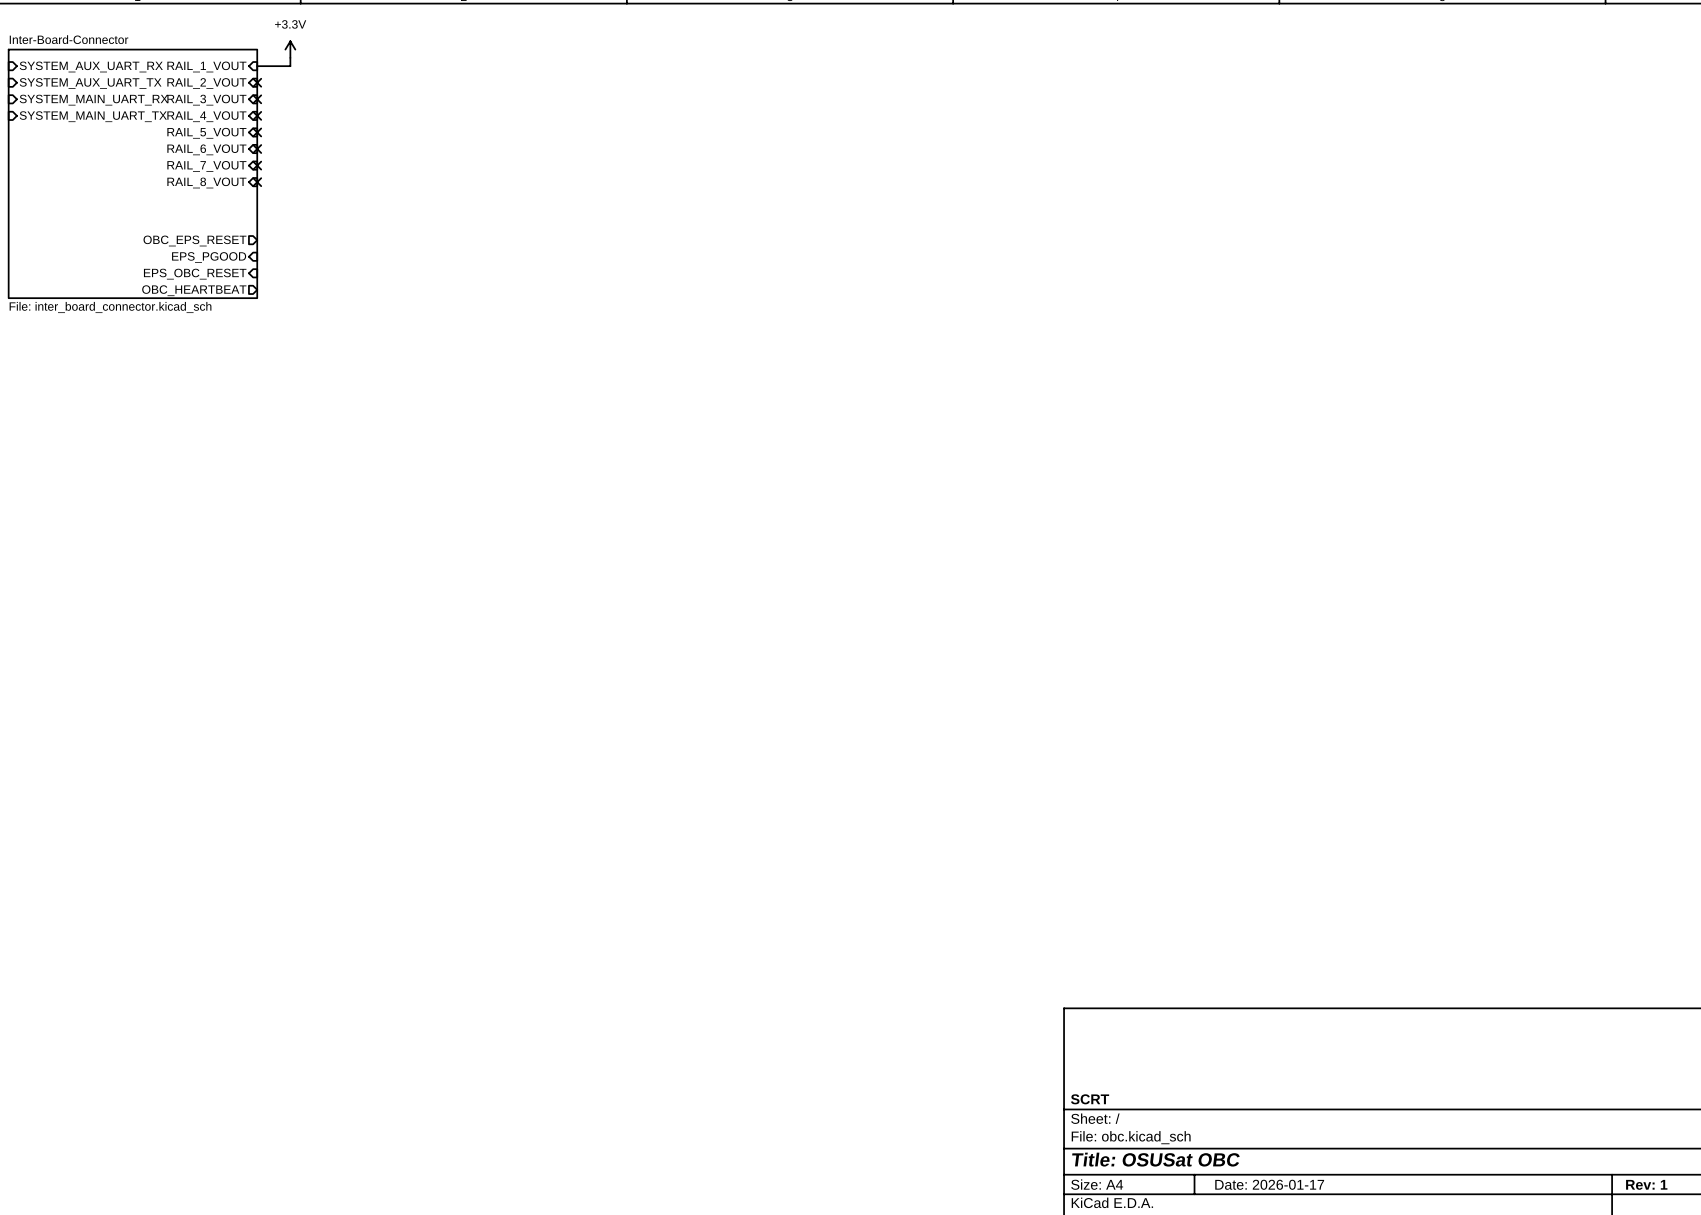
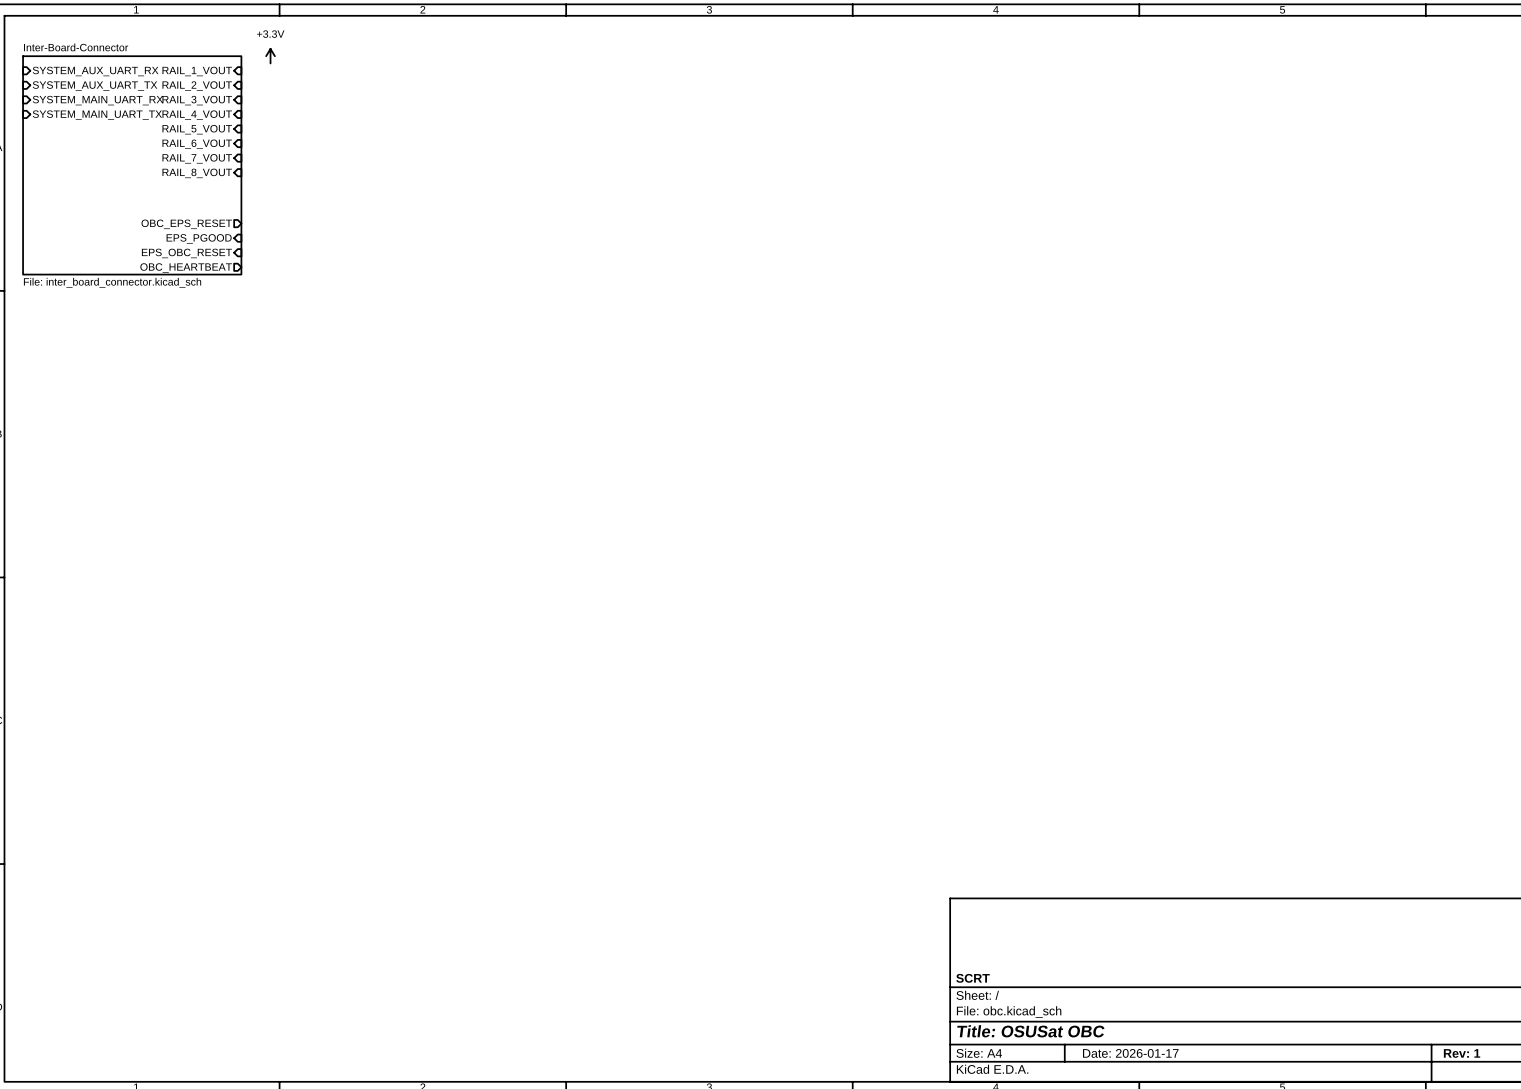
wire: (290, 57) (290, 66) (257, 66) -> none
no-connect mark: (257, 82) -> none
no-connect mark: (257, 99) -> none
no-connect mark: (257, 115) -> none
no-connect mark: (257, 132) -> none
no-connect mark: (257, 149) -> none
no-connect mark: (257, 165) -> none
no-connect mark: (257, 182) -> none

